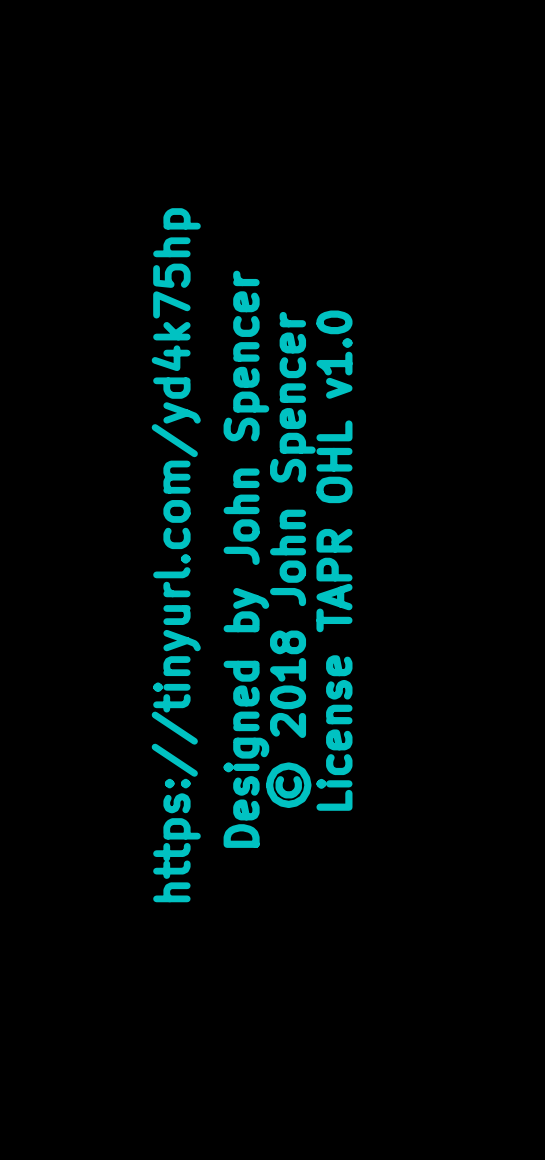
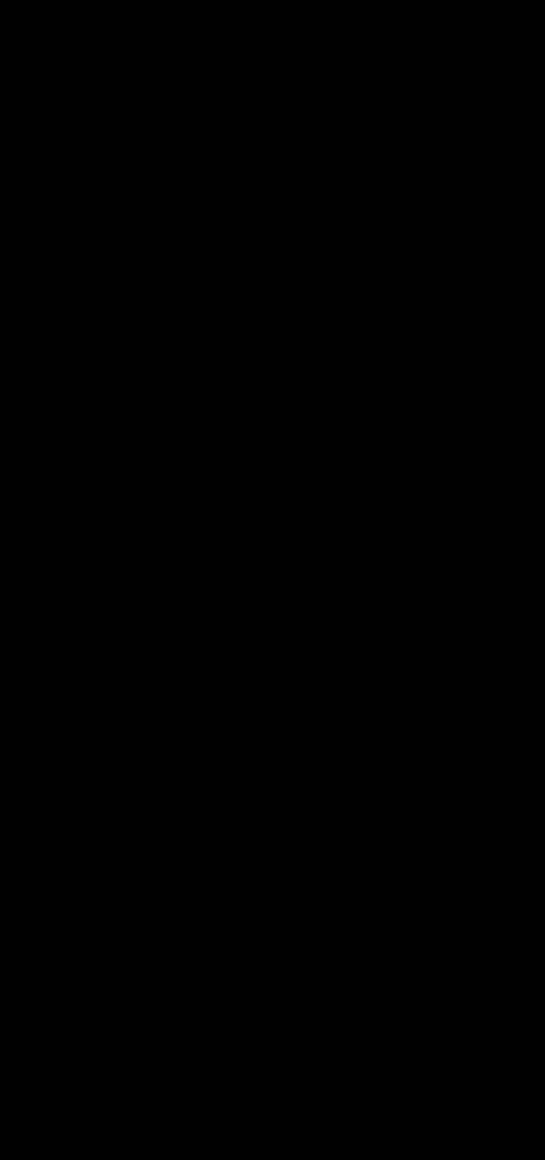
text: https://tinyurl.com/yd4k75hp (176, 555) -> none
text: Designed by John Spencer (246, 559) -> none
text: © 2018 John Spencer (290, 559) -> none
text: License TAPR OHL v1.0 (334, 560) -> none

